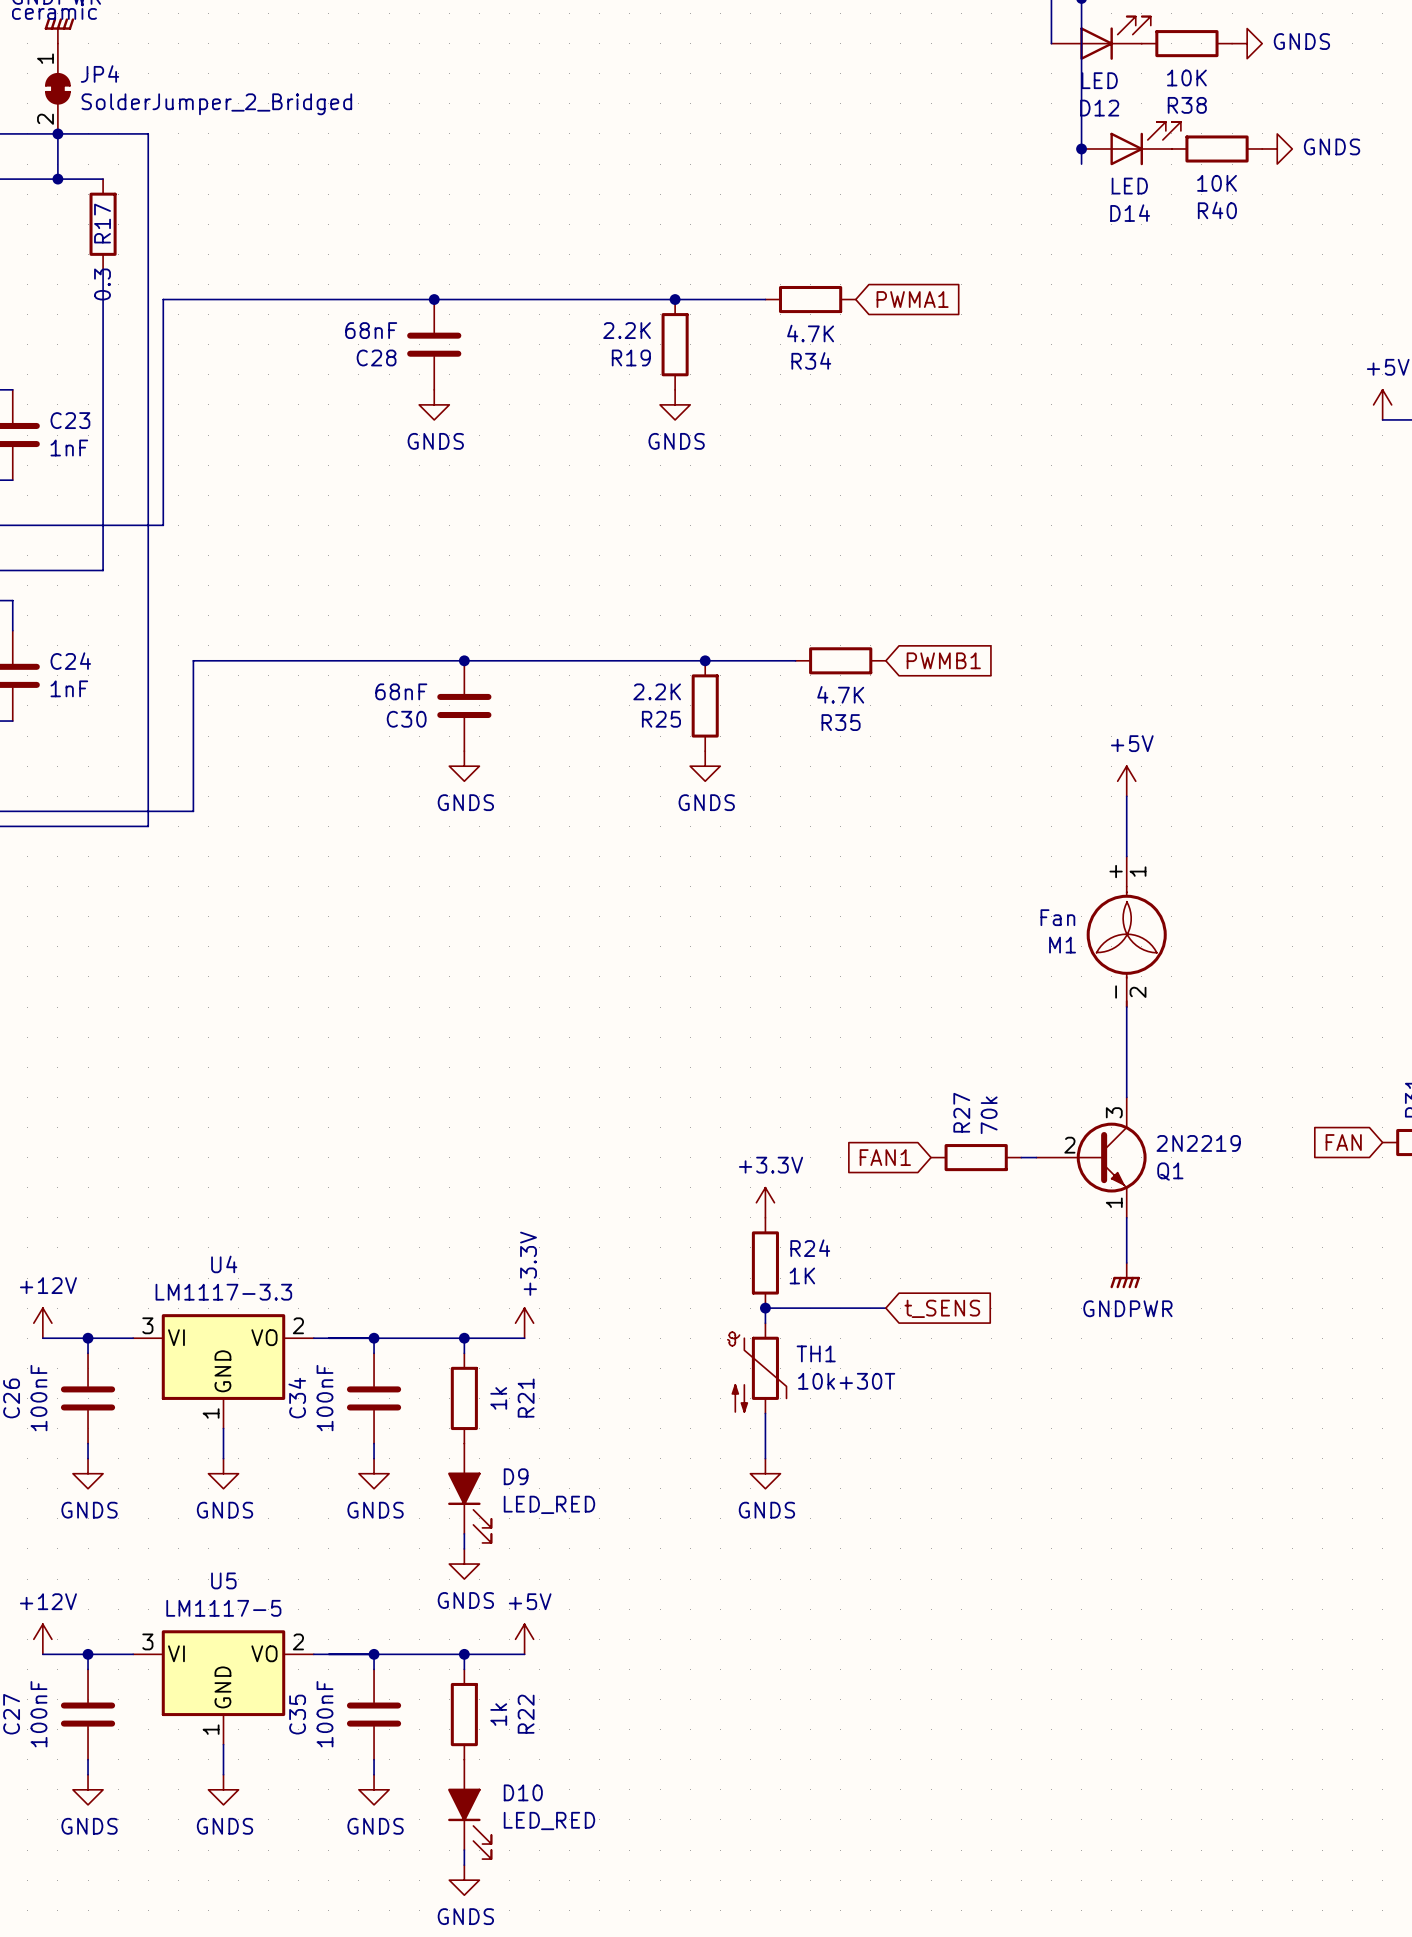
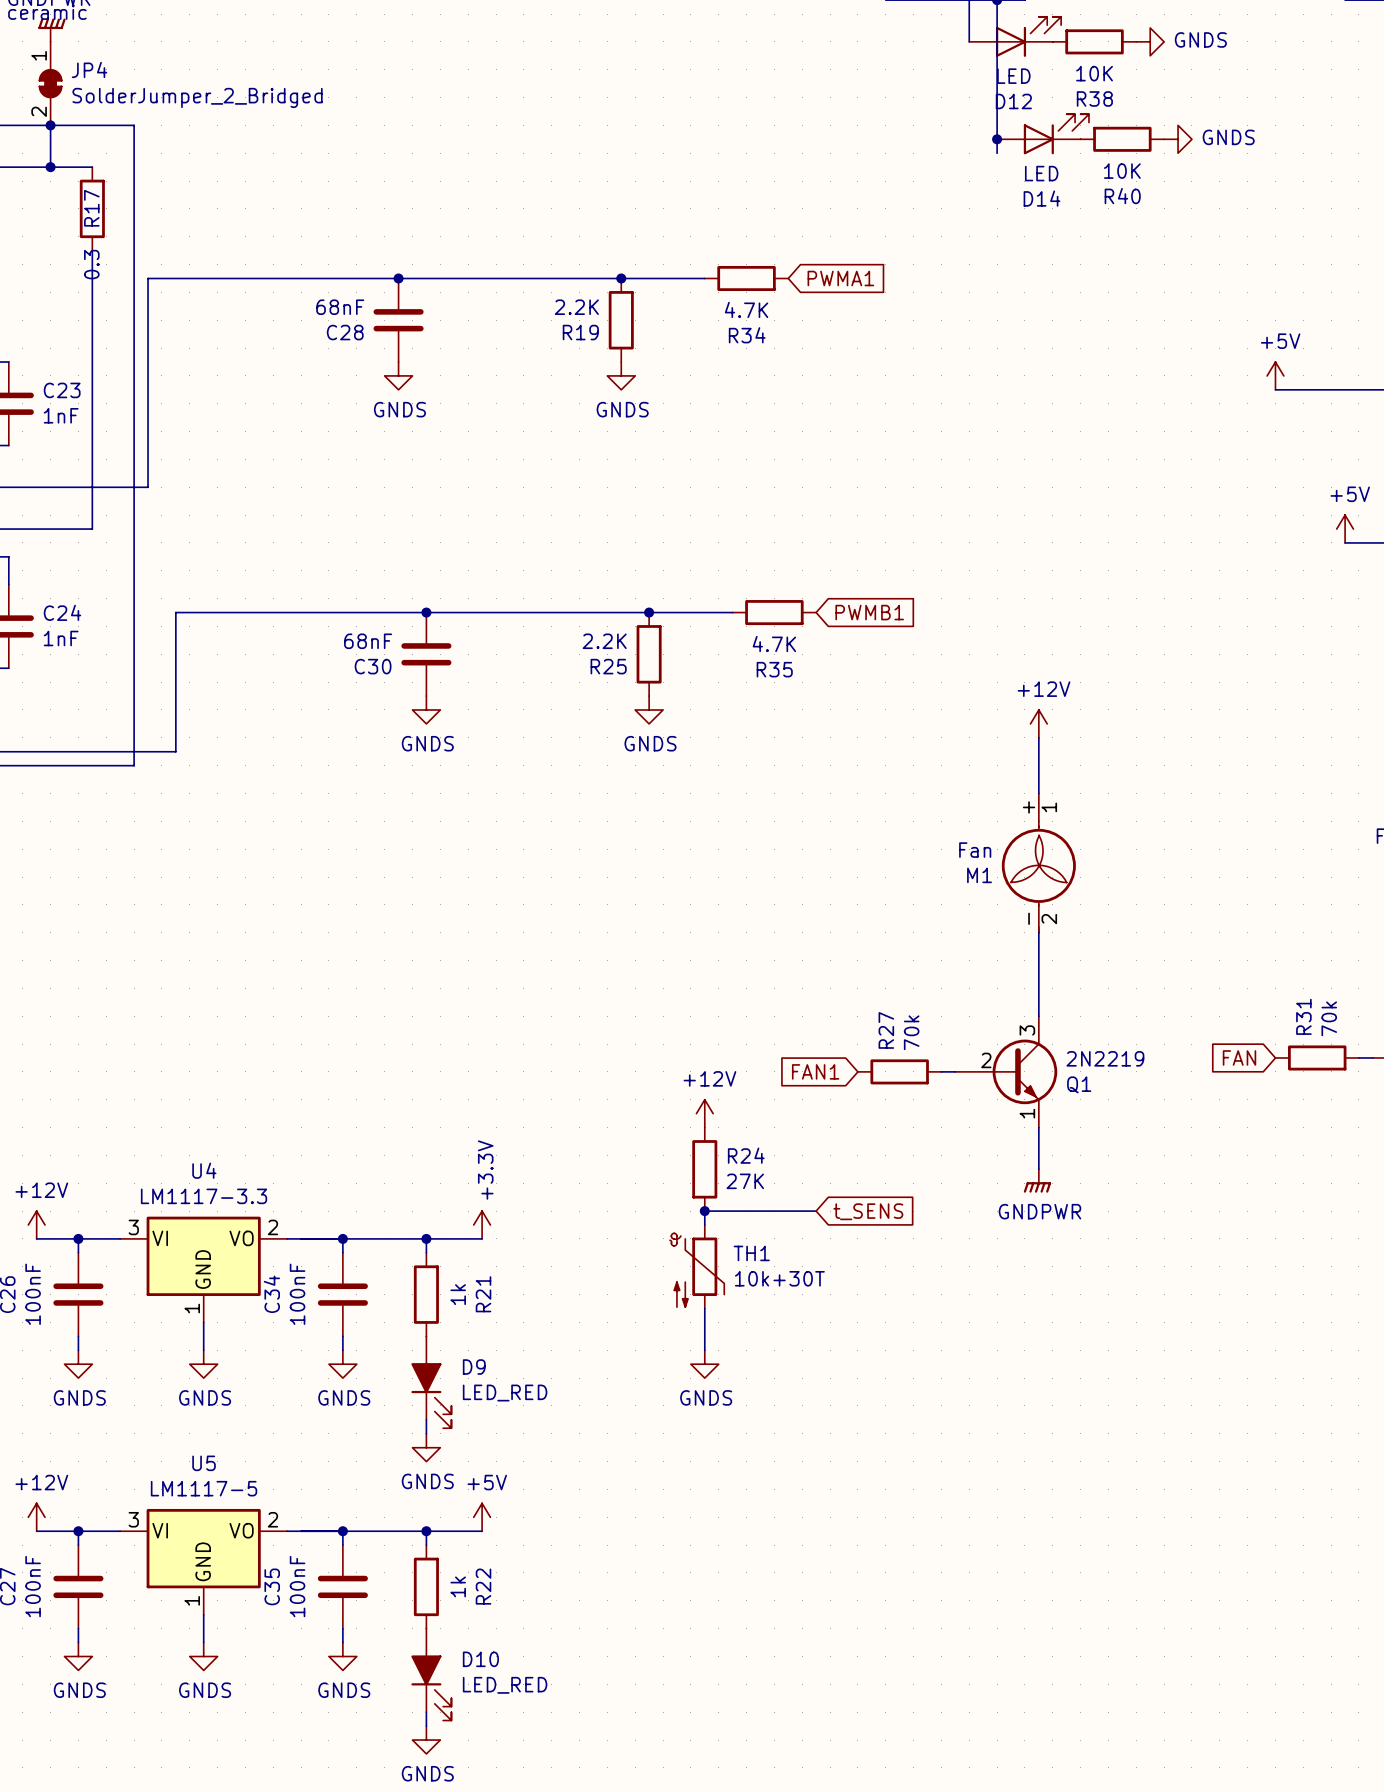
power symbol: +5V (1126, 781) -> +12V (1038, 723)
power symbol: +3.3V (765, 1202) -> +12V (704, 1113)
R24 value: 1K (802, 1275) -> 27K (745, 1181)

